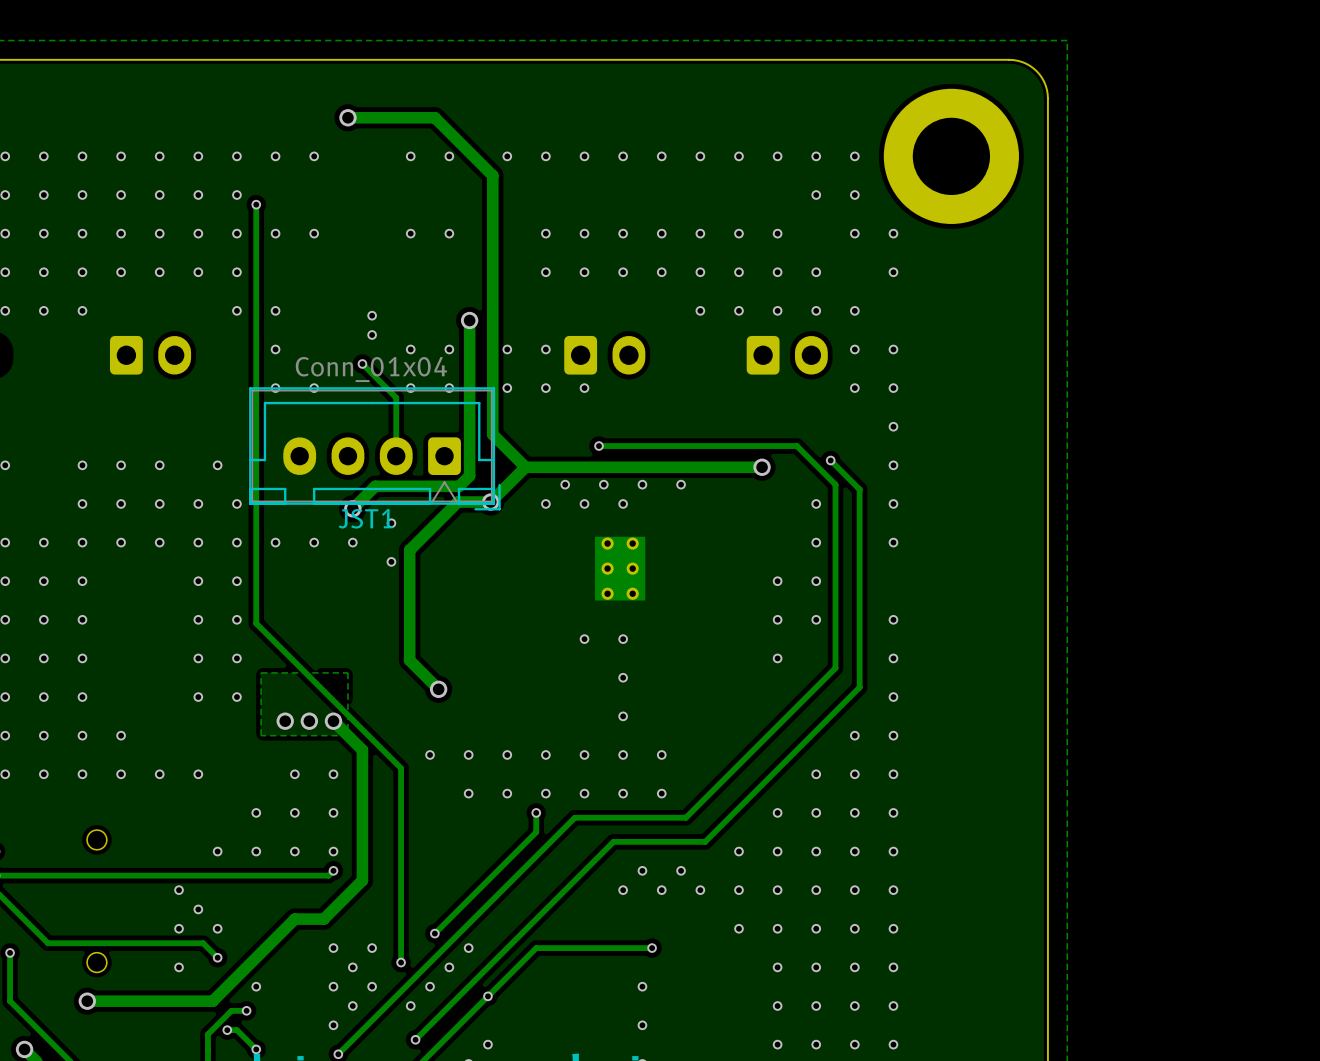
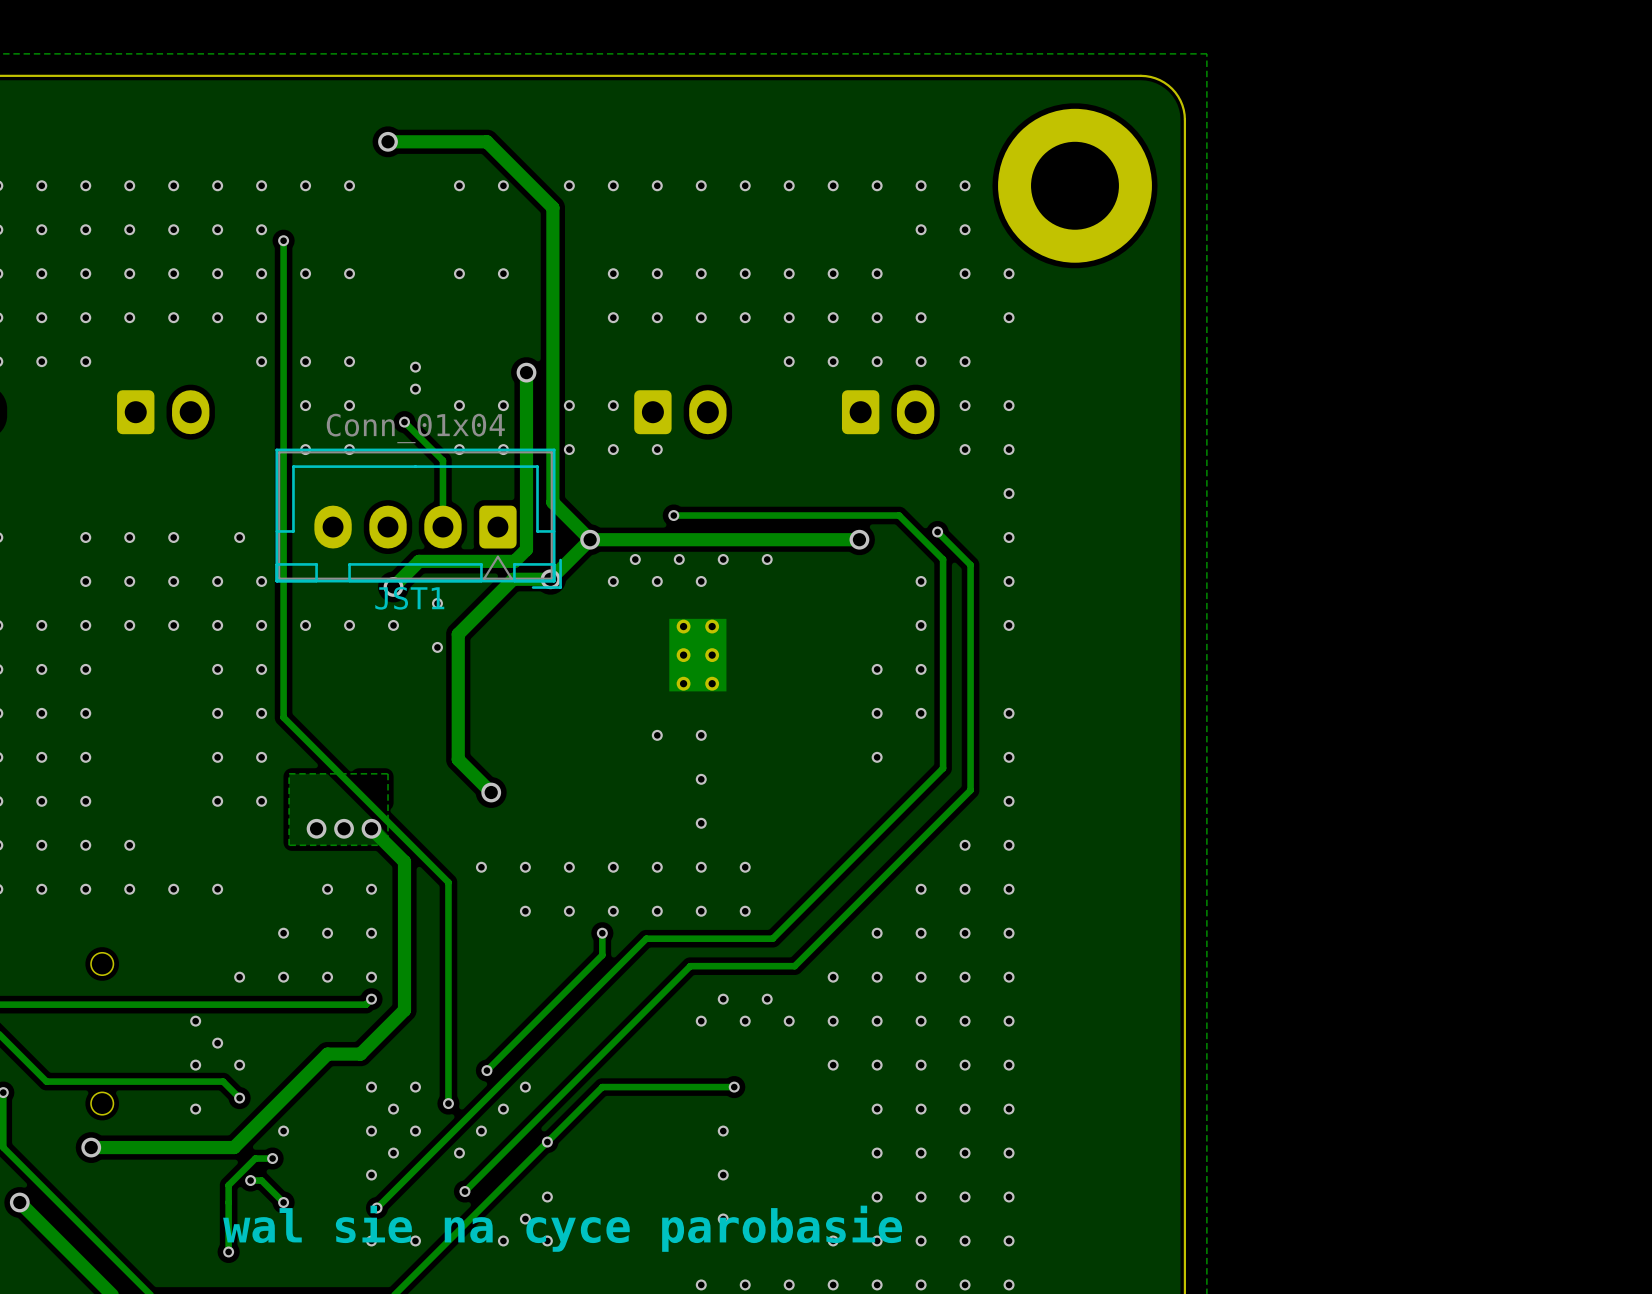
via: none -> (349, 361)
via: none -> (349, 405)
via: none -> (590, 539)

